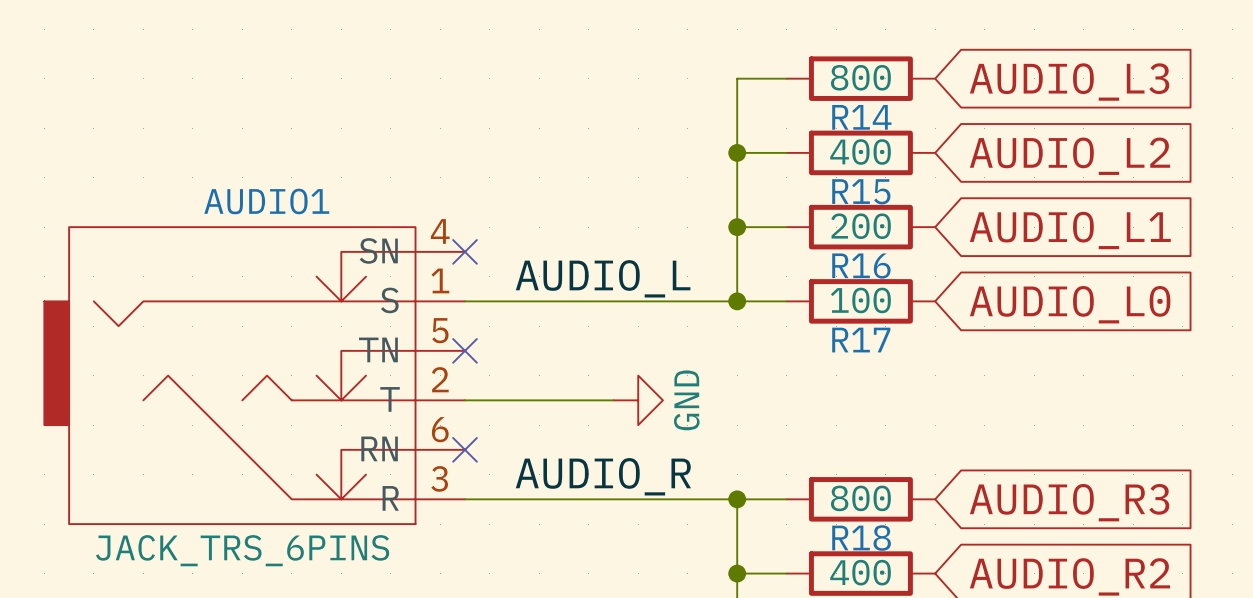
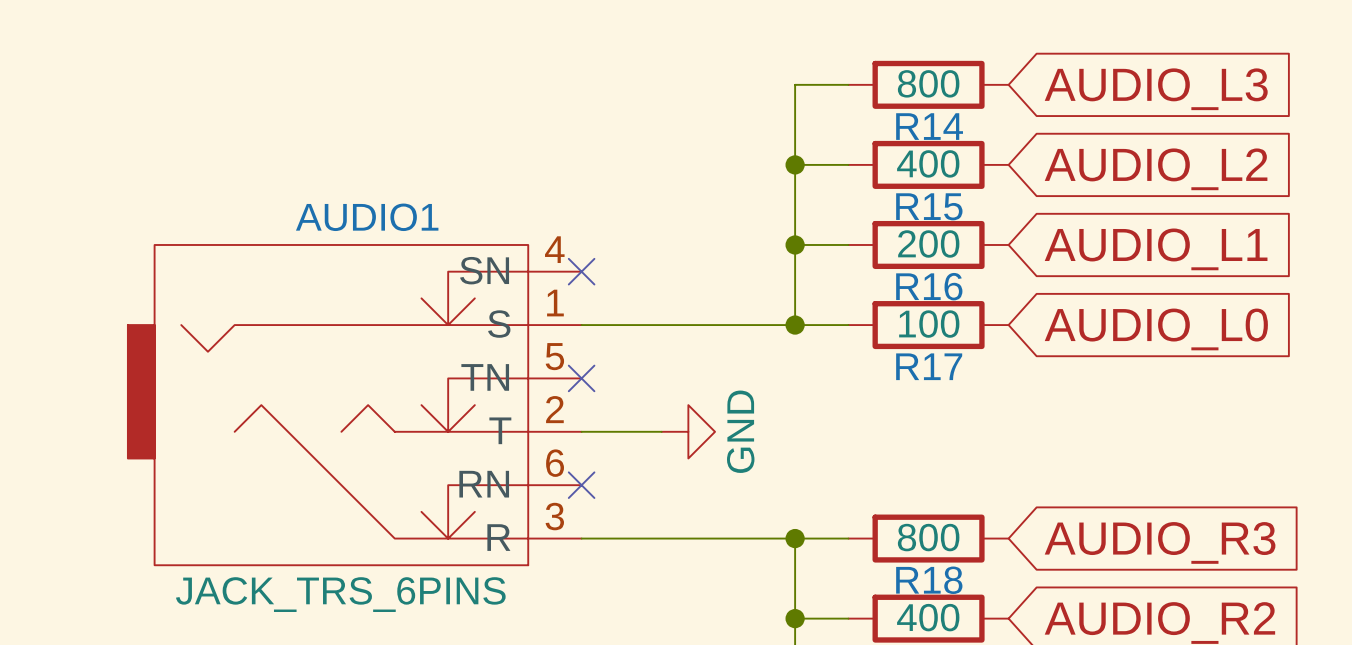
no-connect mark: (465, 251) -> none
no-connect mark: none -> (581, 271)
label: AUDIO_L (603, 278) -> none
no-connect mark: (465, 350) -> none
no-connect mark: none -> (581, 378)
AUDIO1 position: (254, 375) -> (354, 405)
no-connect mark: (465, 449) -> none
no-connect mark: none -> (581, 485)
label: AUDIO_R (603, 476) -> none

